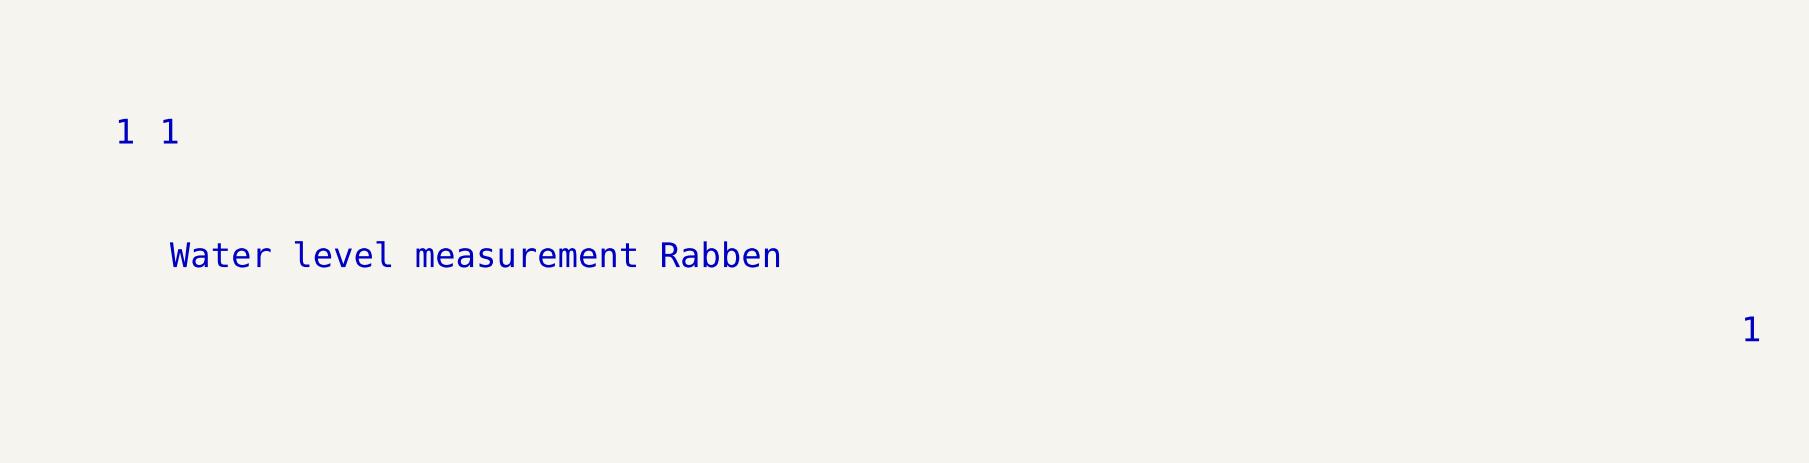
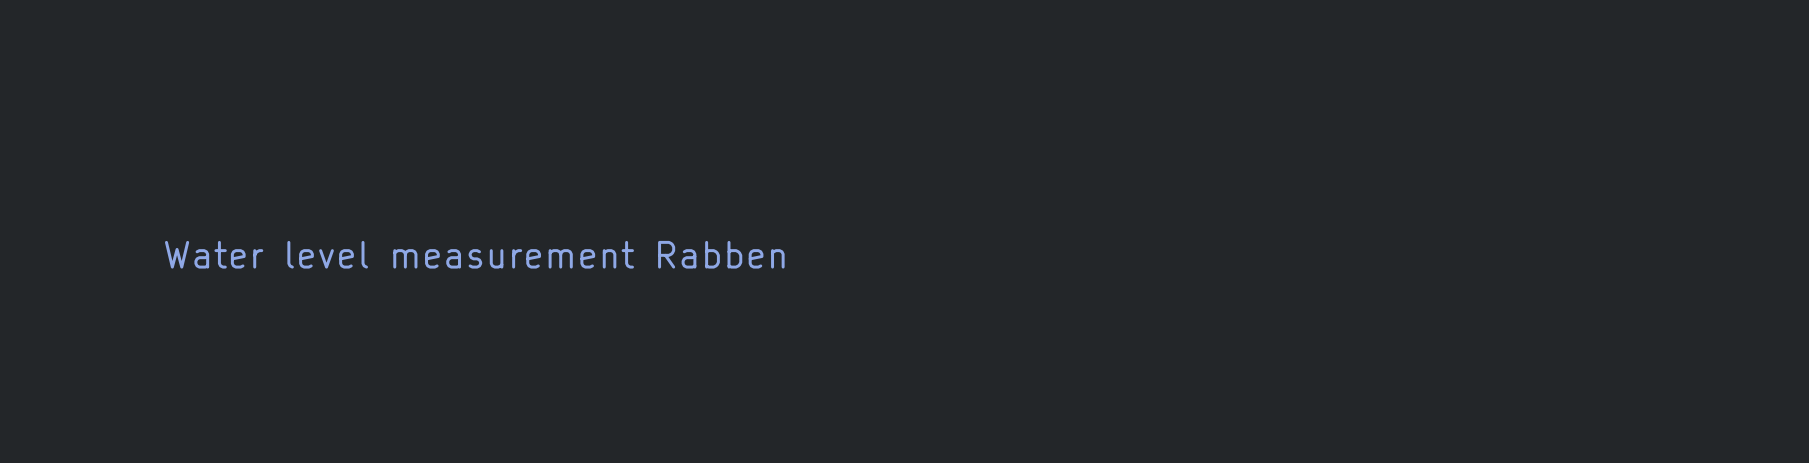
text: 1 (125, 131) -> none
text: 1 (170, 131) -> none
text: 1 (1752, 328) -> none

